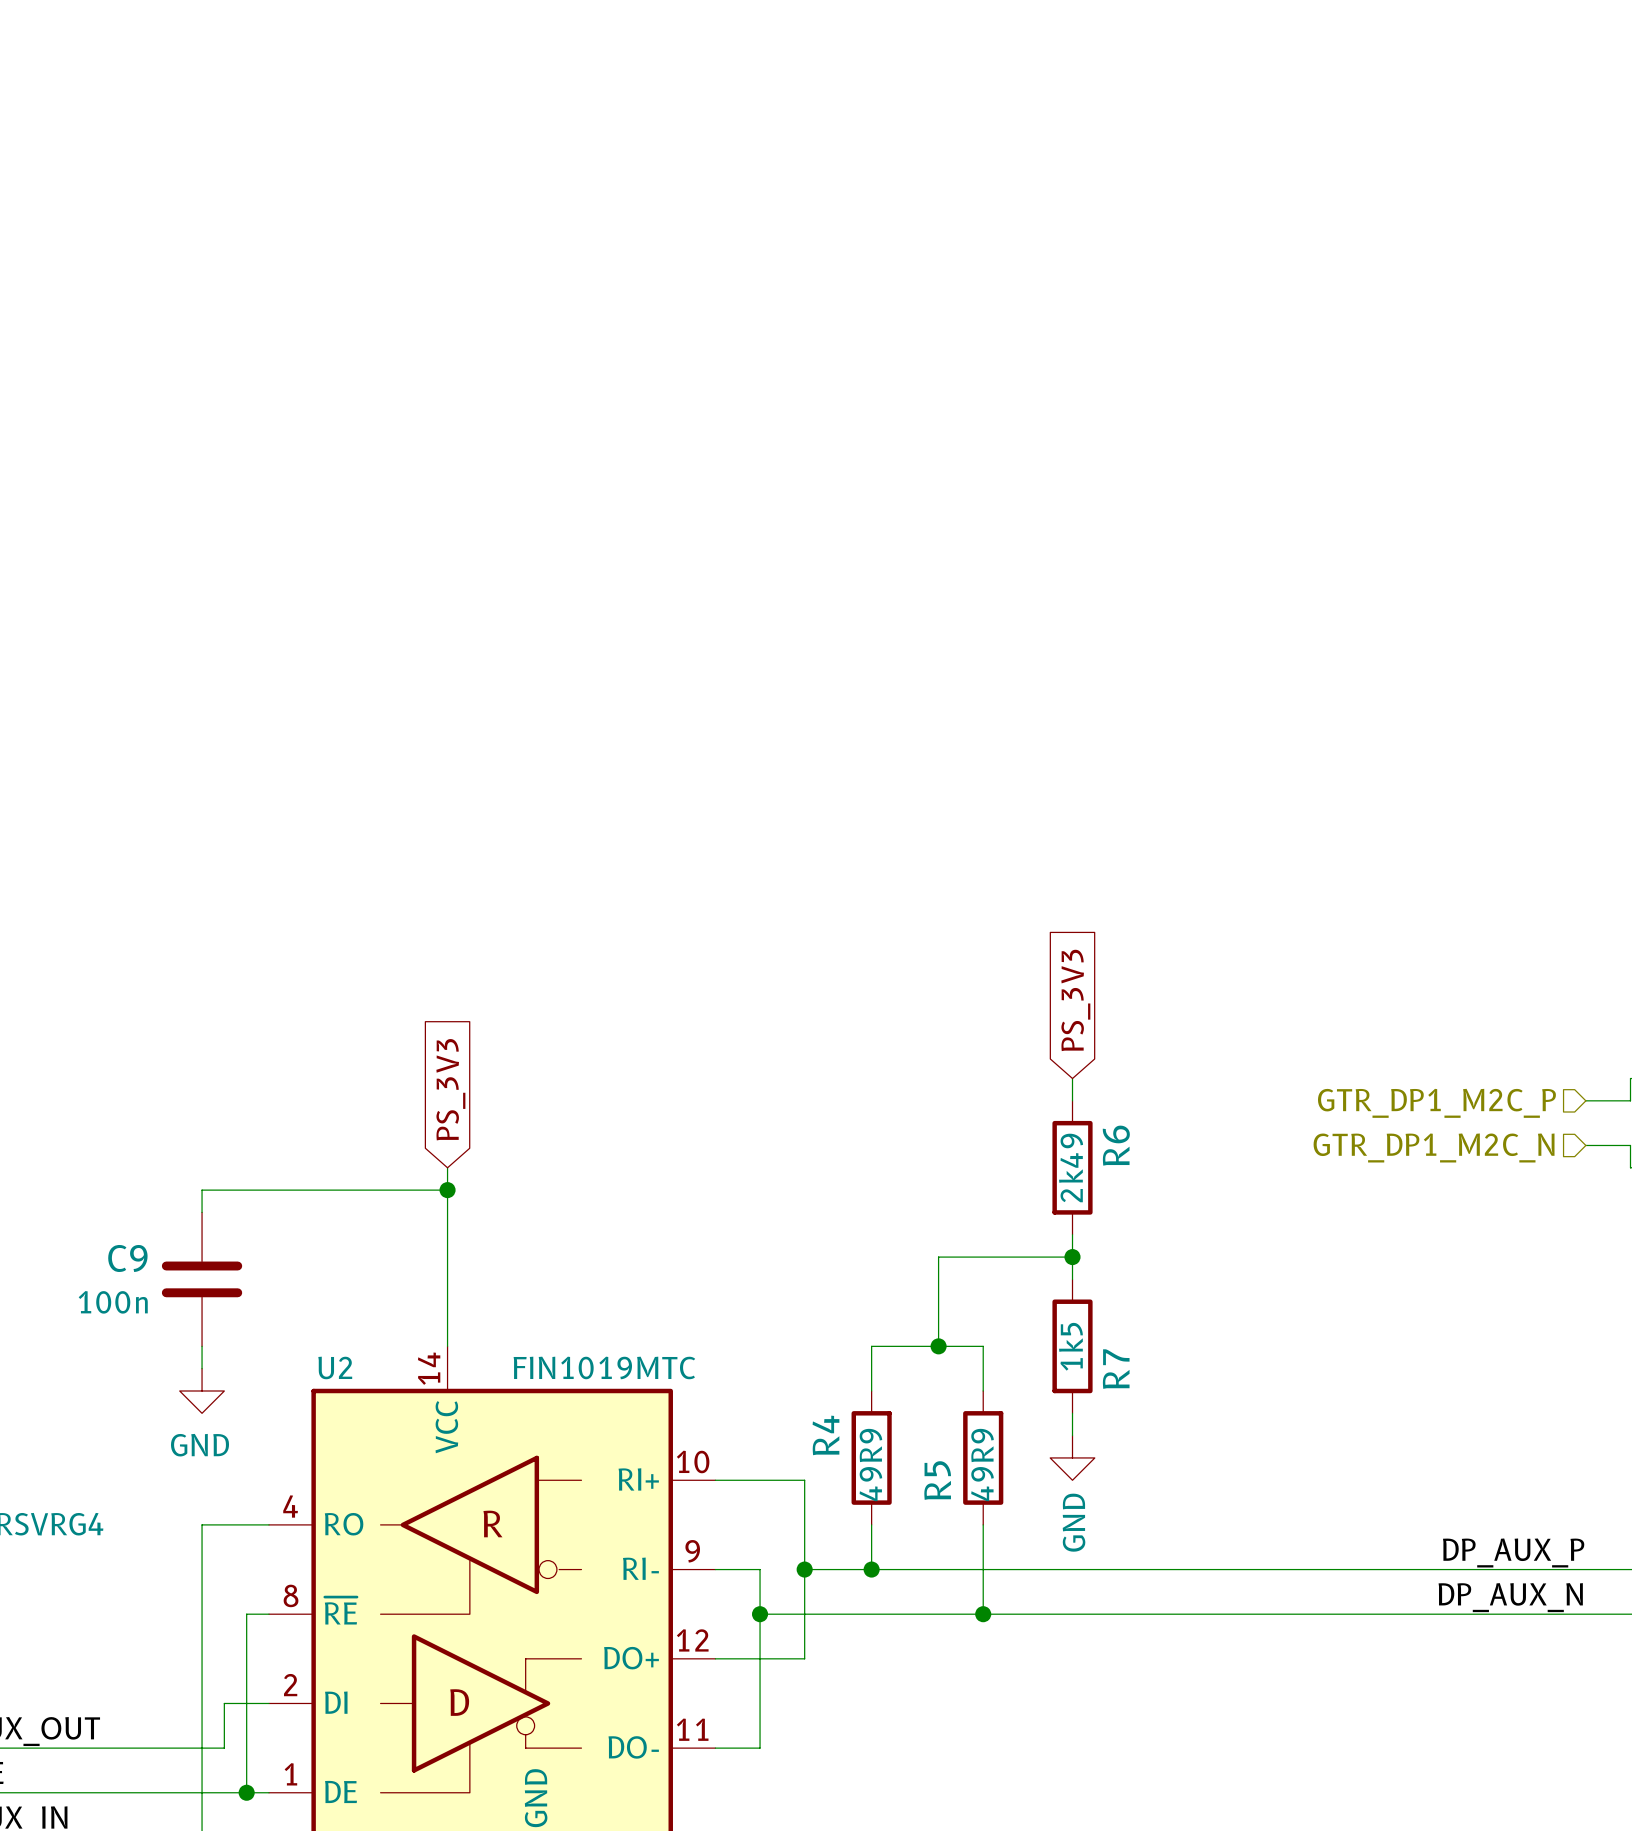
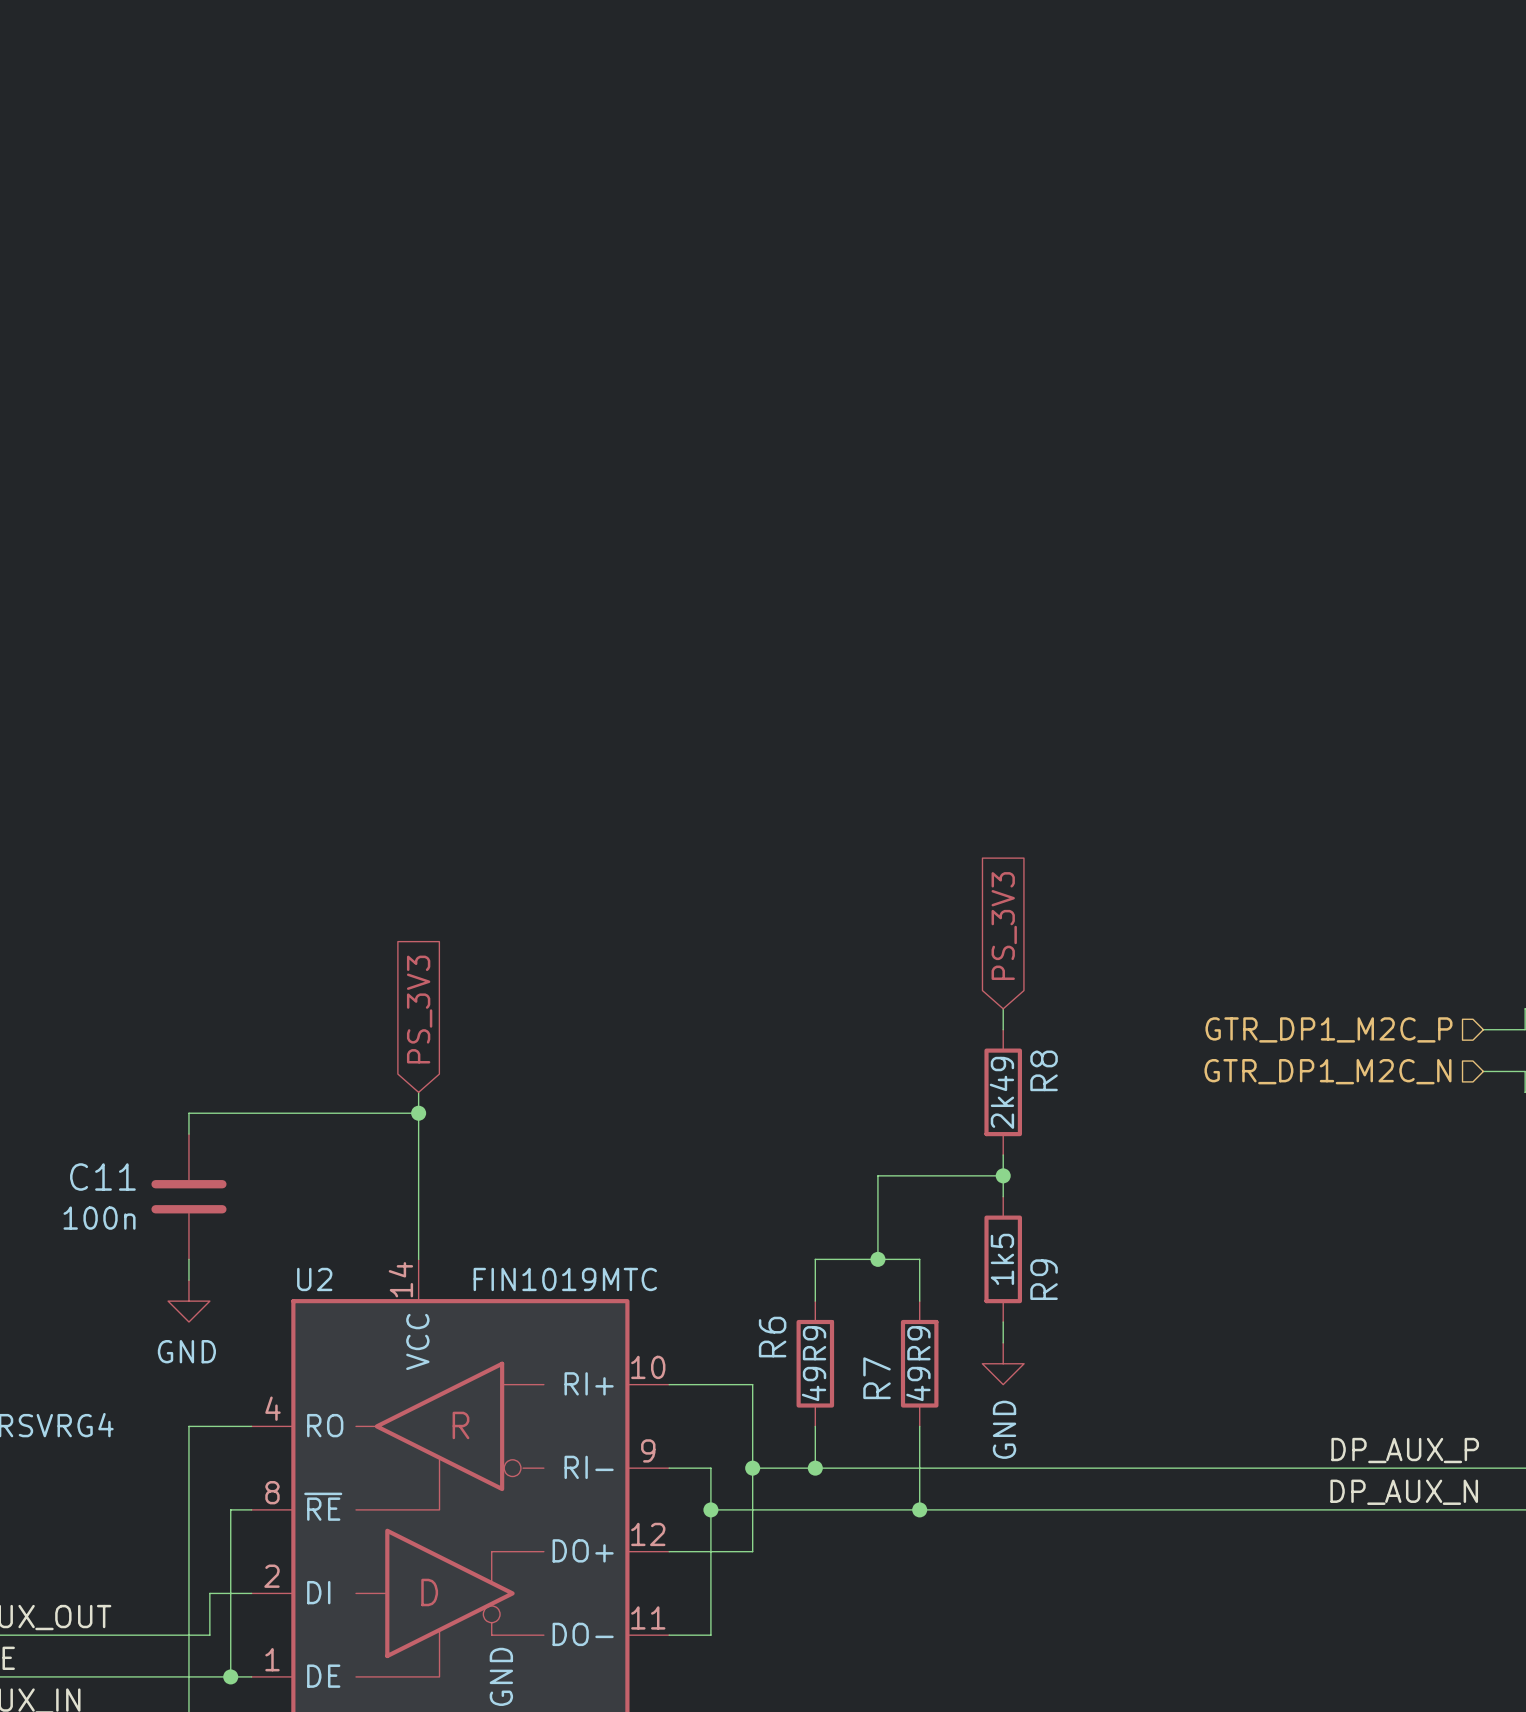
R6 name: R6 (1116, 1145) -> R8 (1044, 1070)
C9 name: C9 (127, 1258) -> C11 (102, 1177)
R7 name: R7 (1116, 1369) -> R9 (1044, 1279)
R4 name: R4 (825, 1435) -> R6 (772, 1337)
R5 name: R5 (937, 1480) -> R7 (877, 1378)

